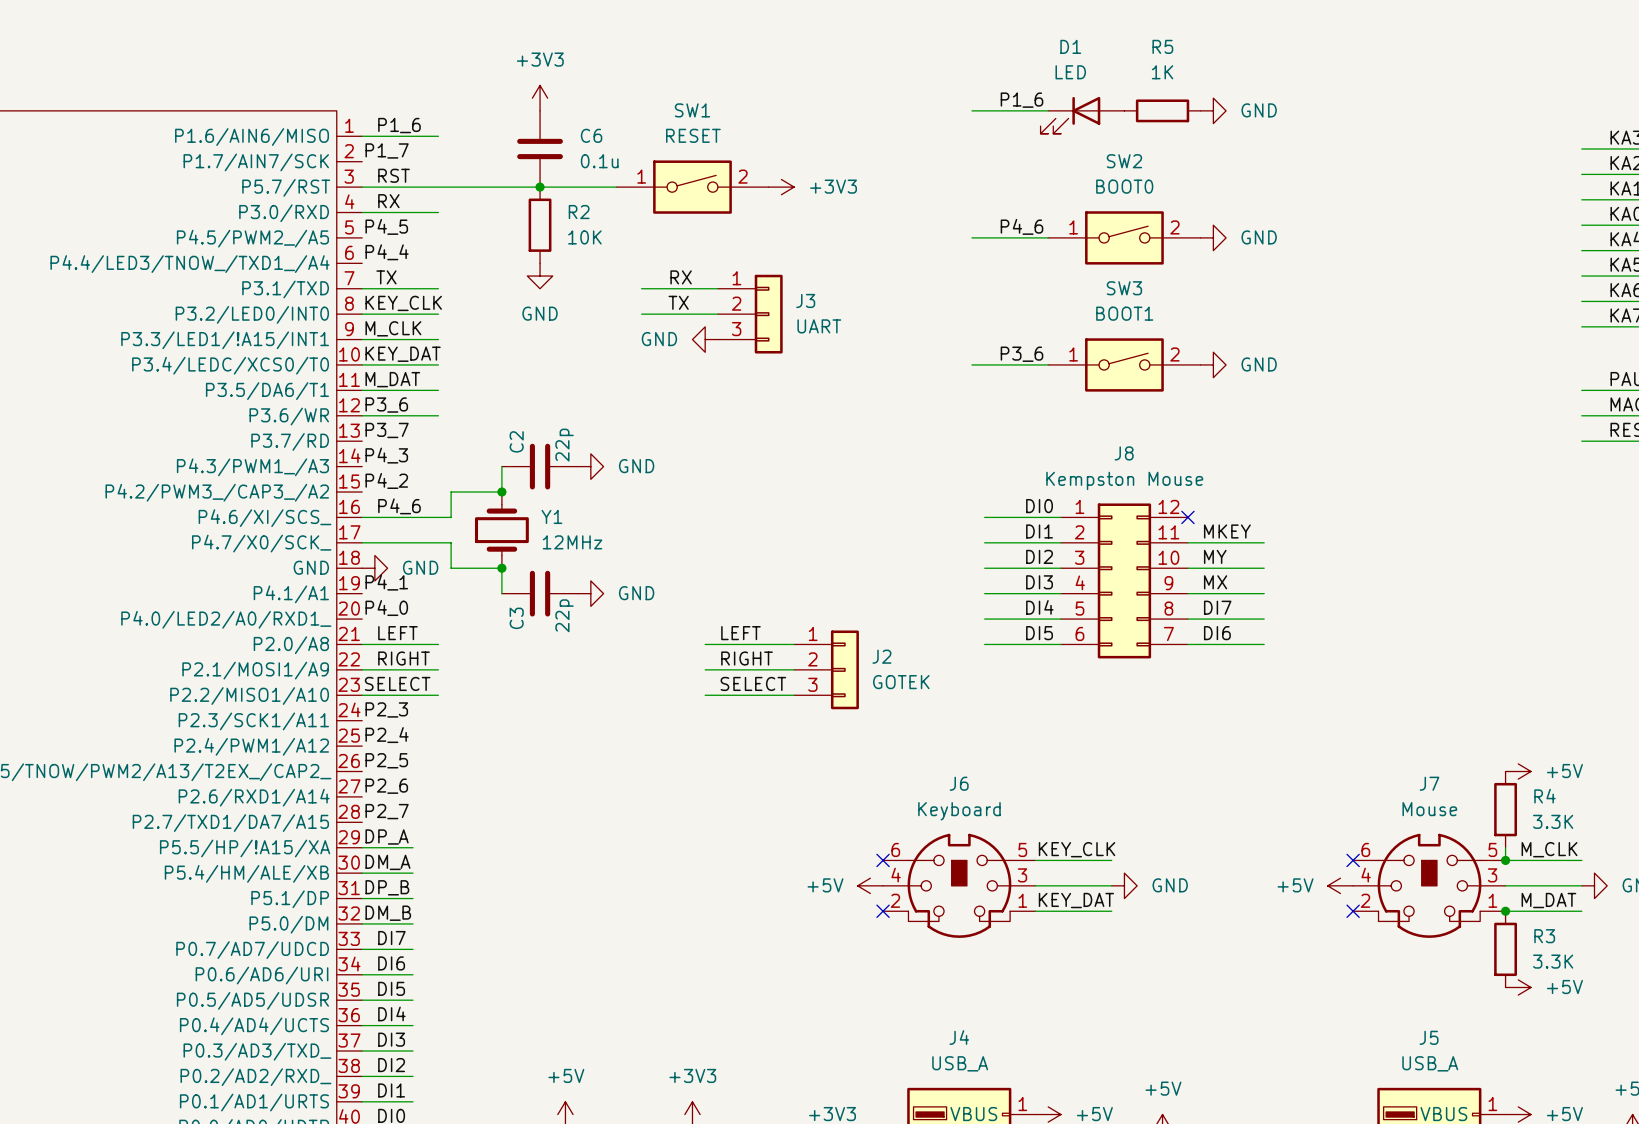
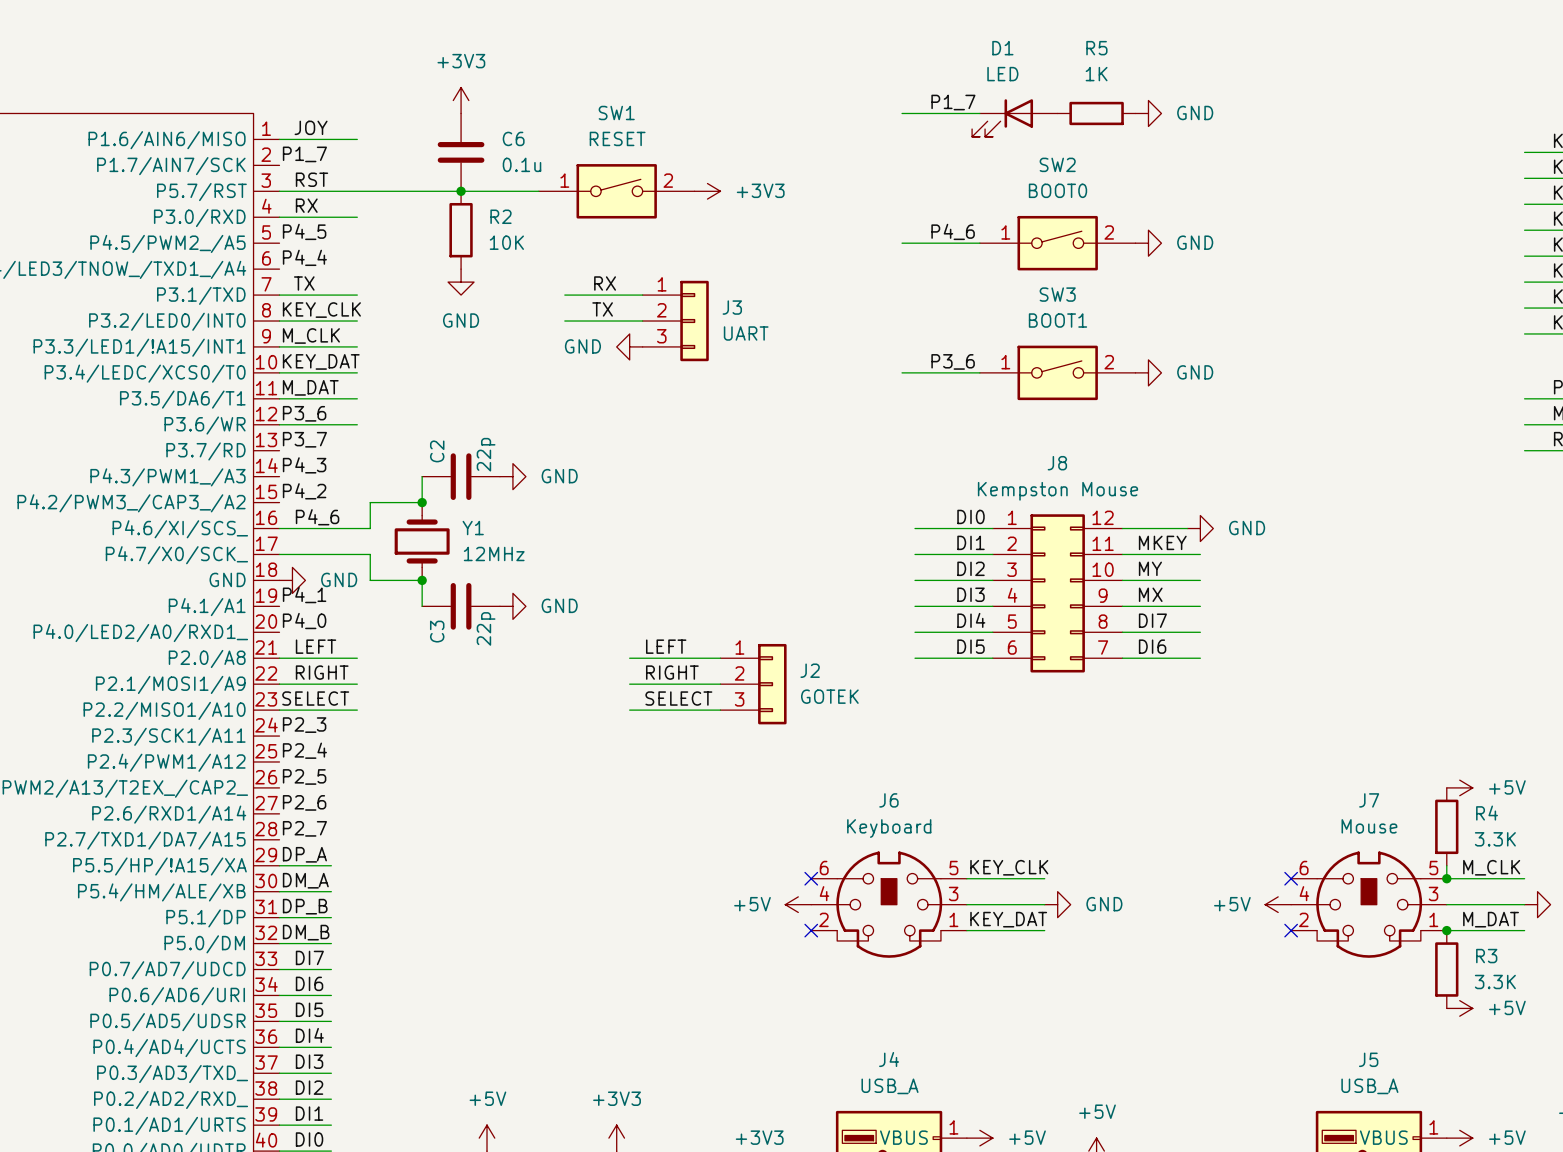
label: P1_6 (1021, 100) -> P1_7 (953, 102)
label: P1_6 (399, 125) -> JOY (311, 127)
wire: none -> (1122, 528) (1187, 528)
no-connect mark: (1187, 517) -> none
power symbol: none -> GND (1200, 528)

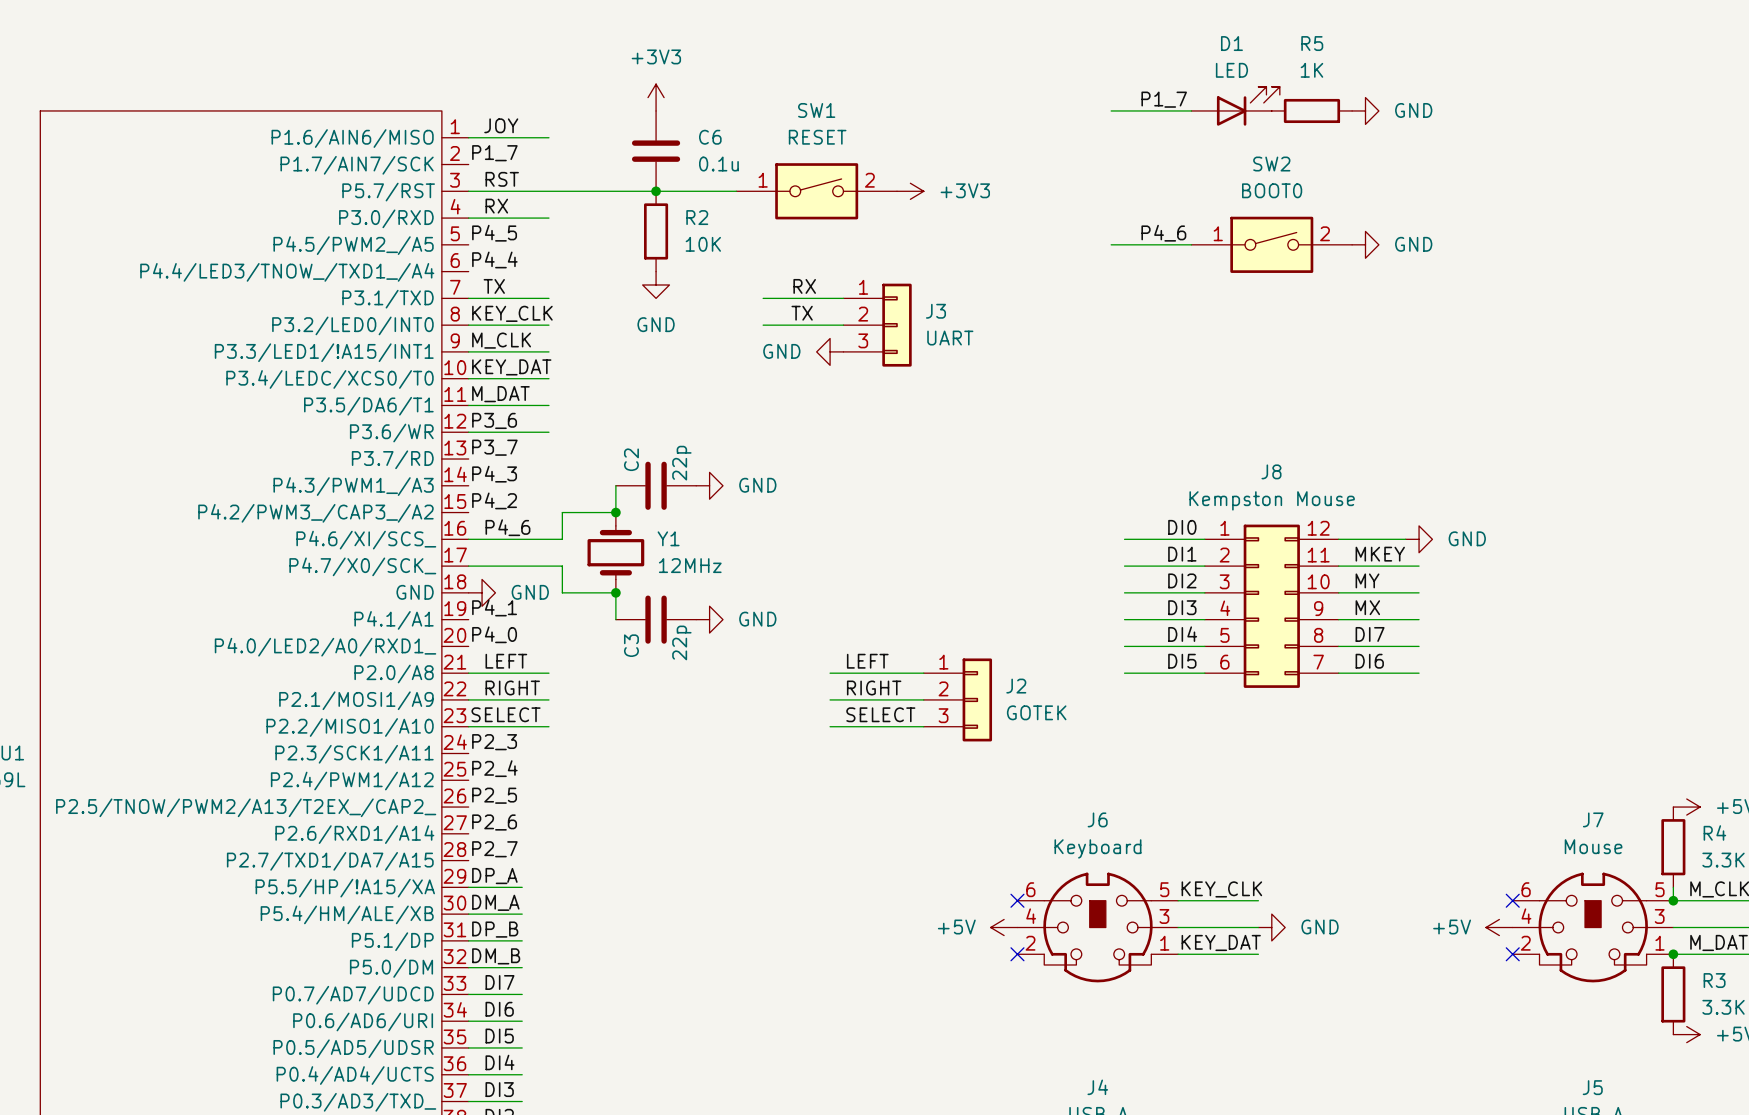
D1 rotation: 0° (1002, 118) -> 180° (1248, 106)
label: P3_6 (953, 361) -> none
wire: (902, 372) (979, 372) -> none
SW3: BOOT1 (1057, 372) -> none
power symbol: GND (1148, 372) -> none

